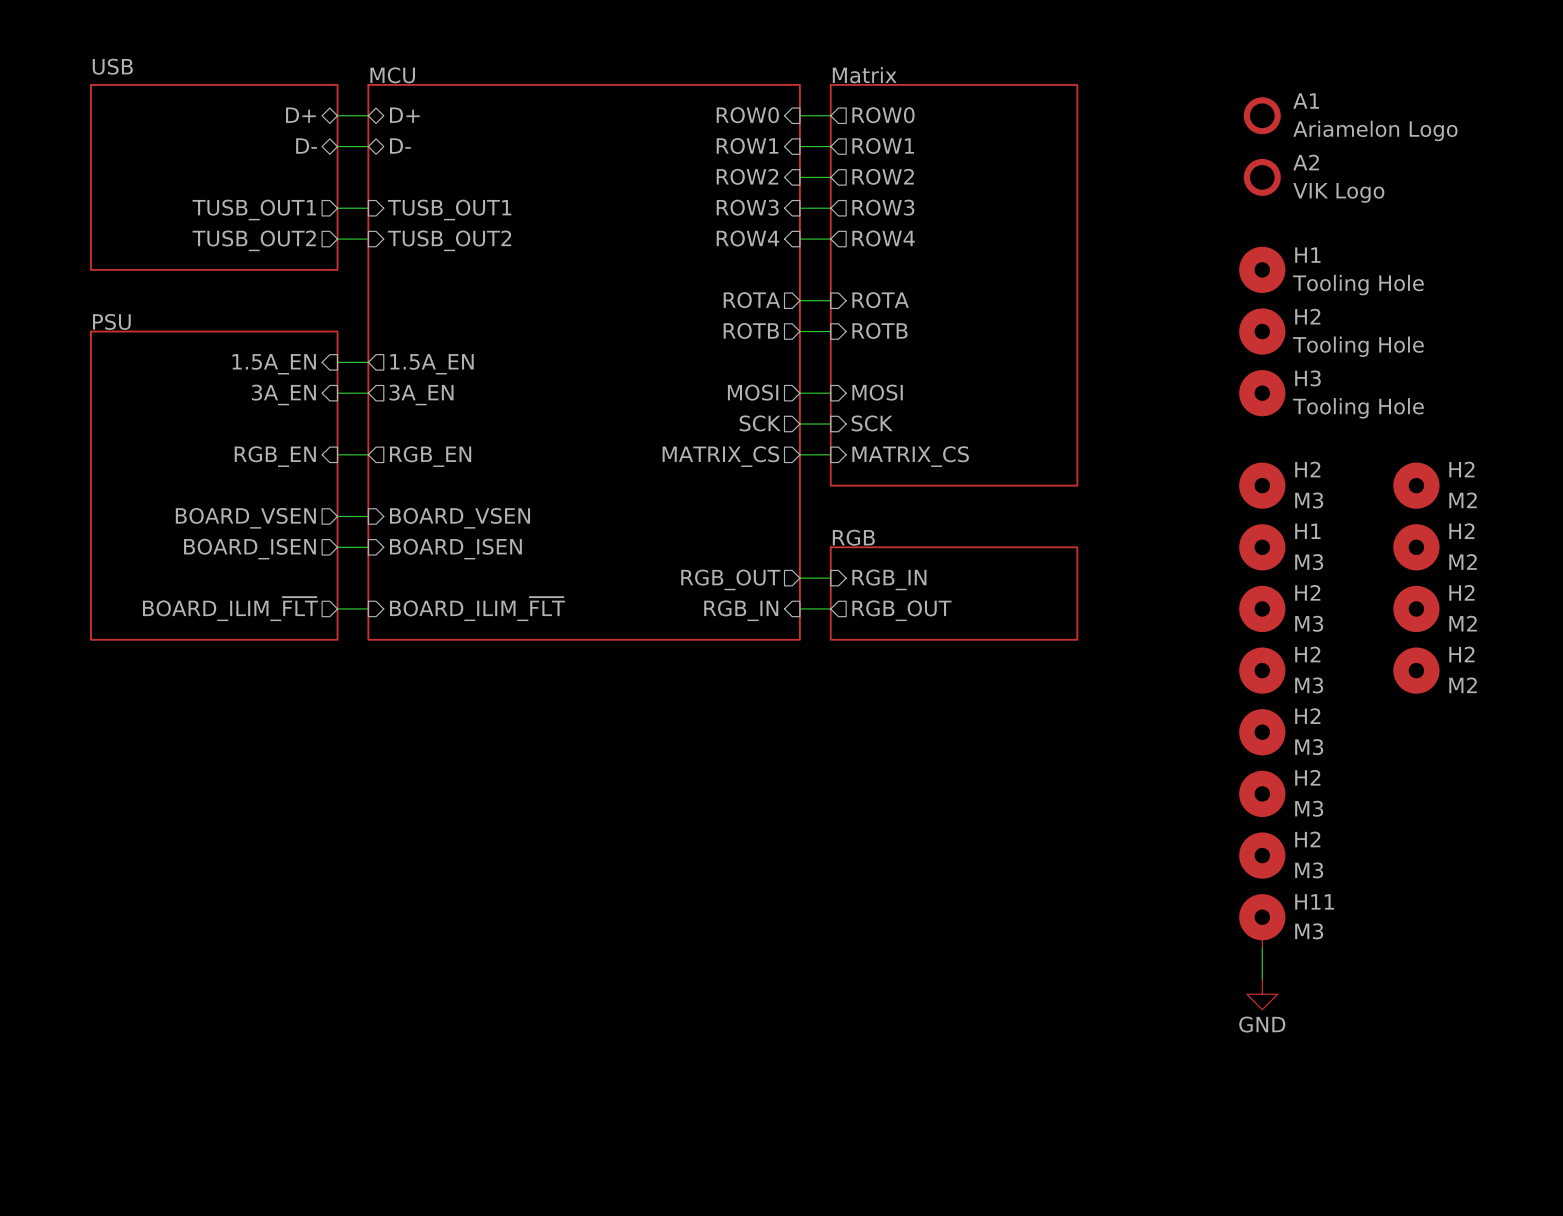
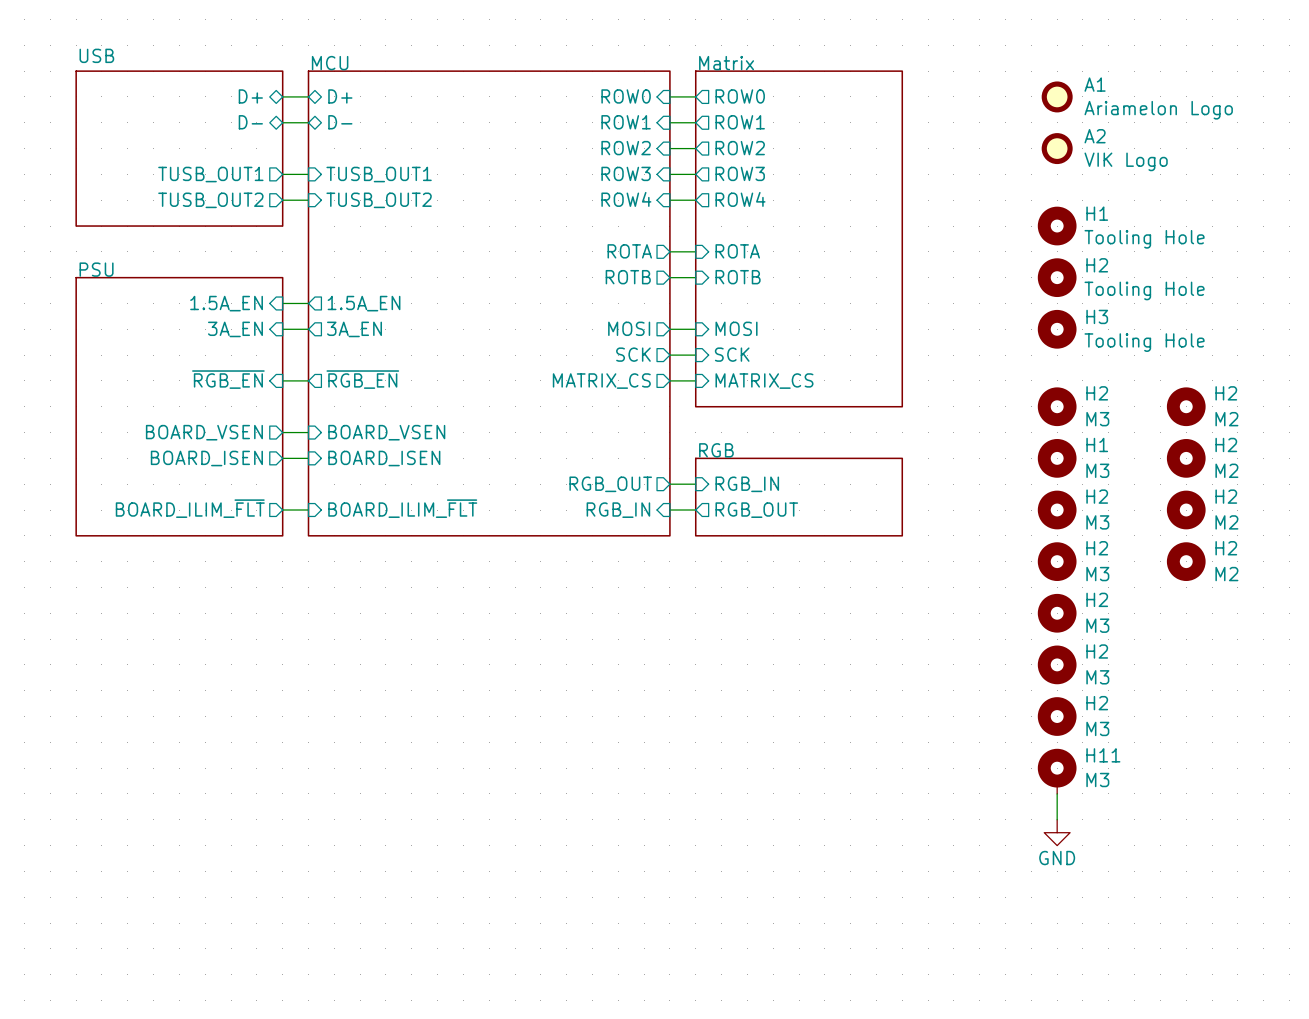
sheet pin: RGB_EN (275, 456) -> ~{RGB_EN} (228, 379)
sheet pin: RGB_EN (430, 456) -> ~{RGB_EN} (362, 379)

